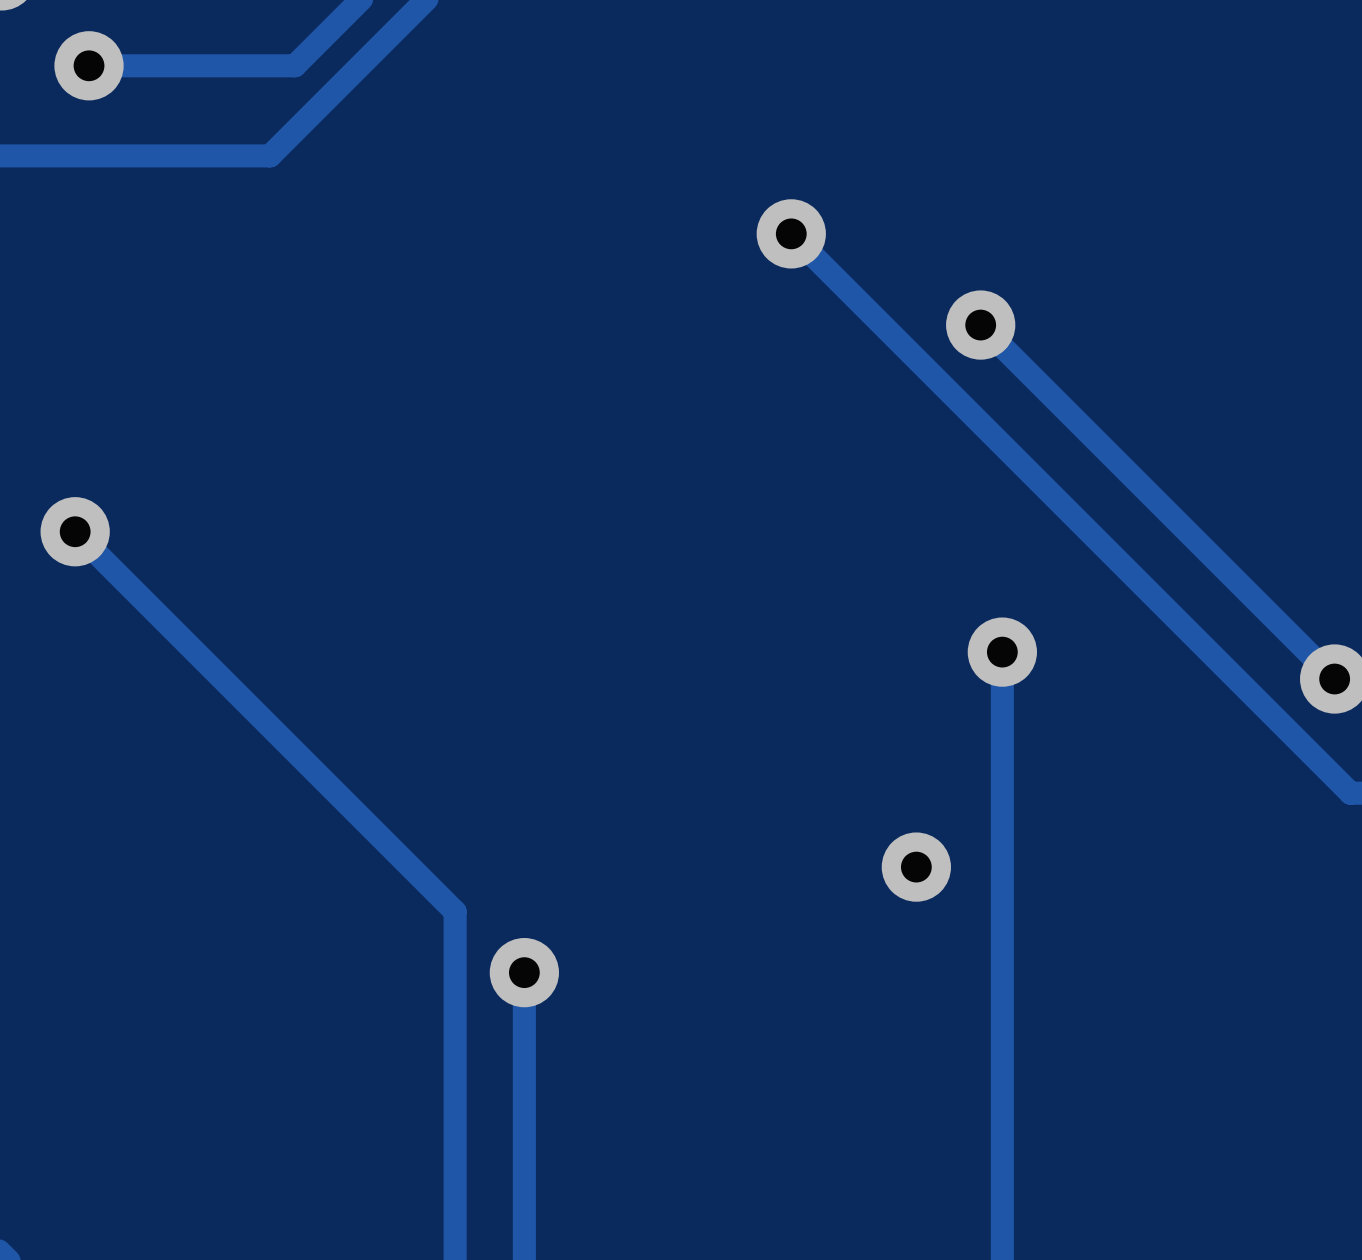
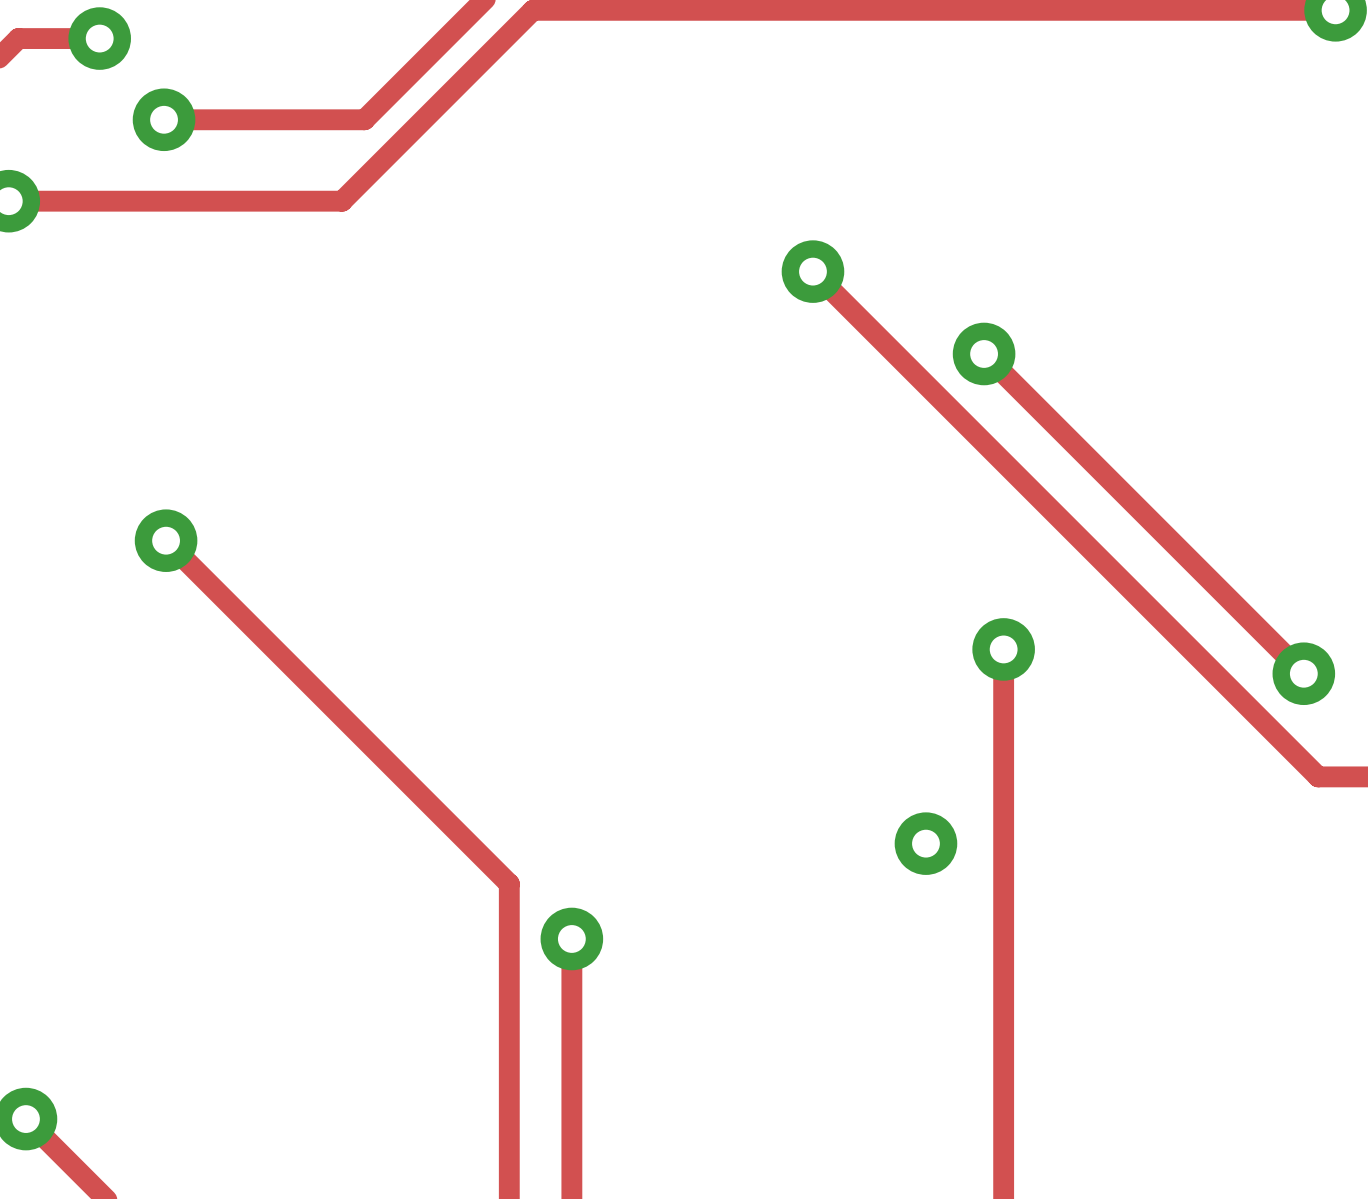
via position: (89, 65) -> (164, 119)

